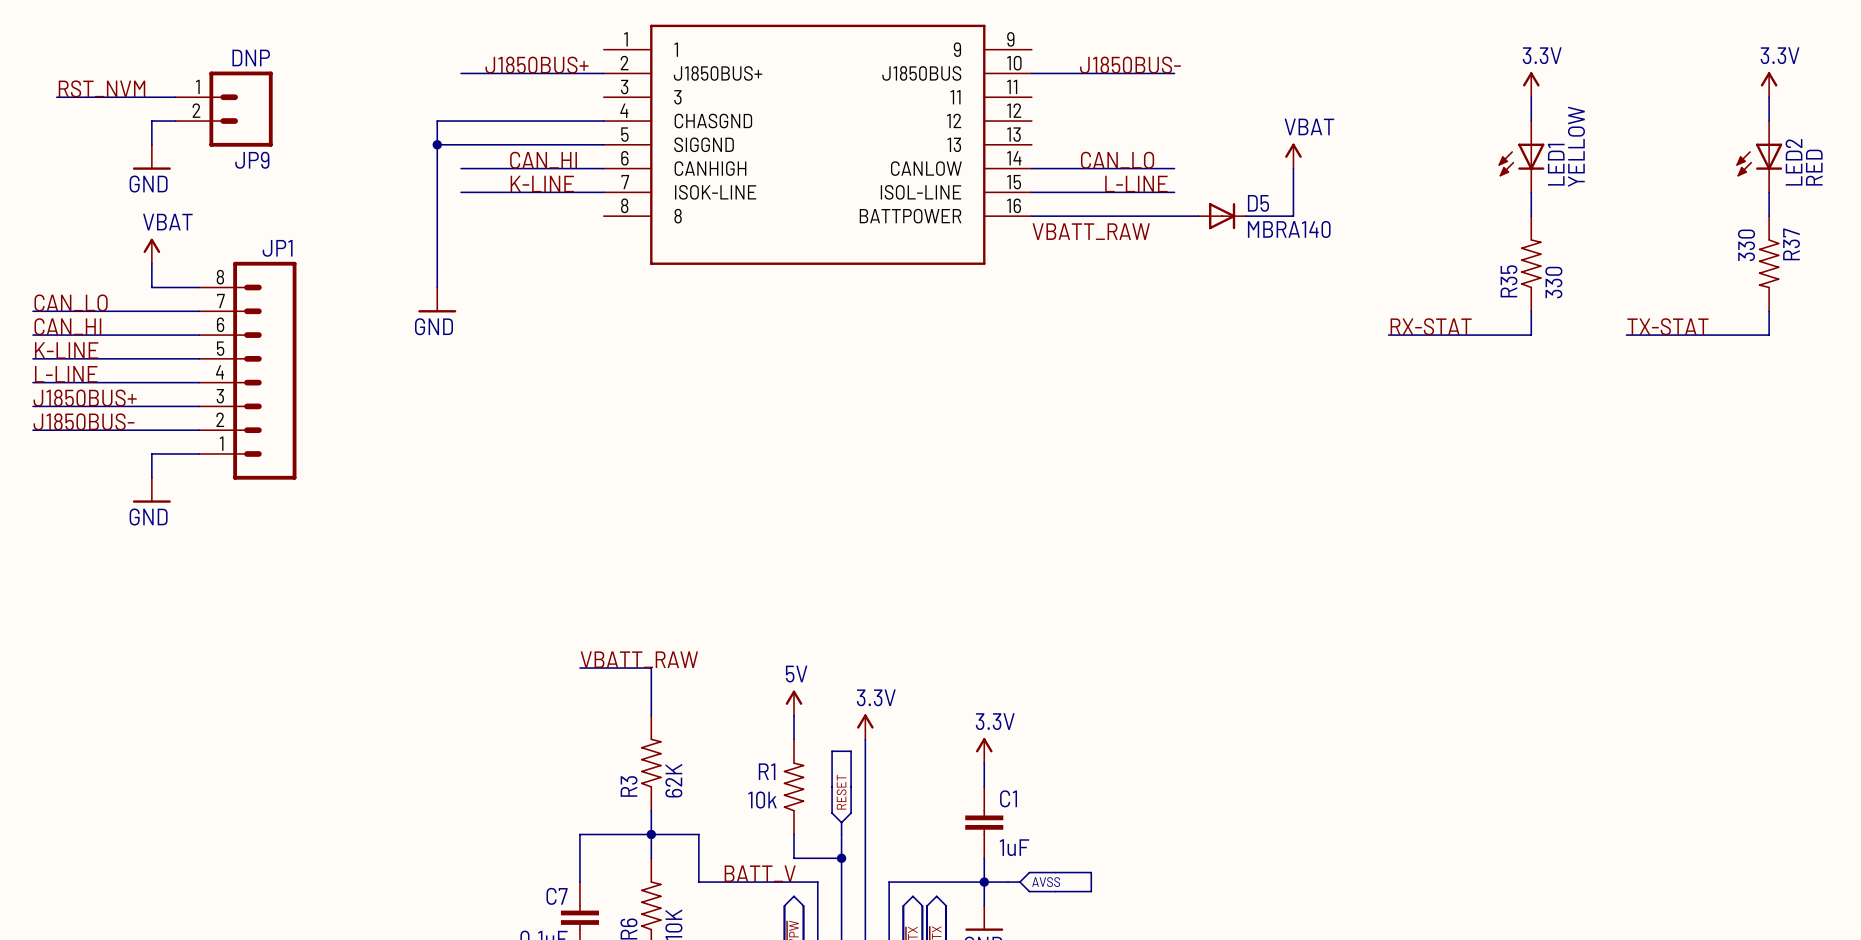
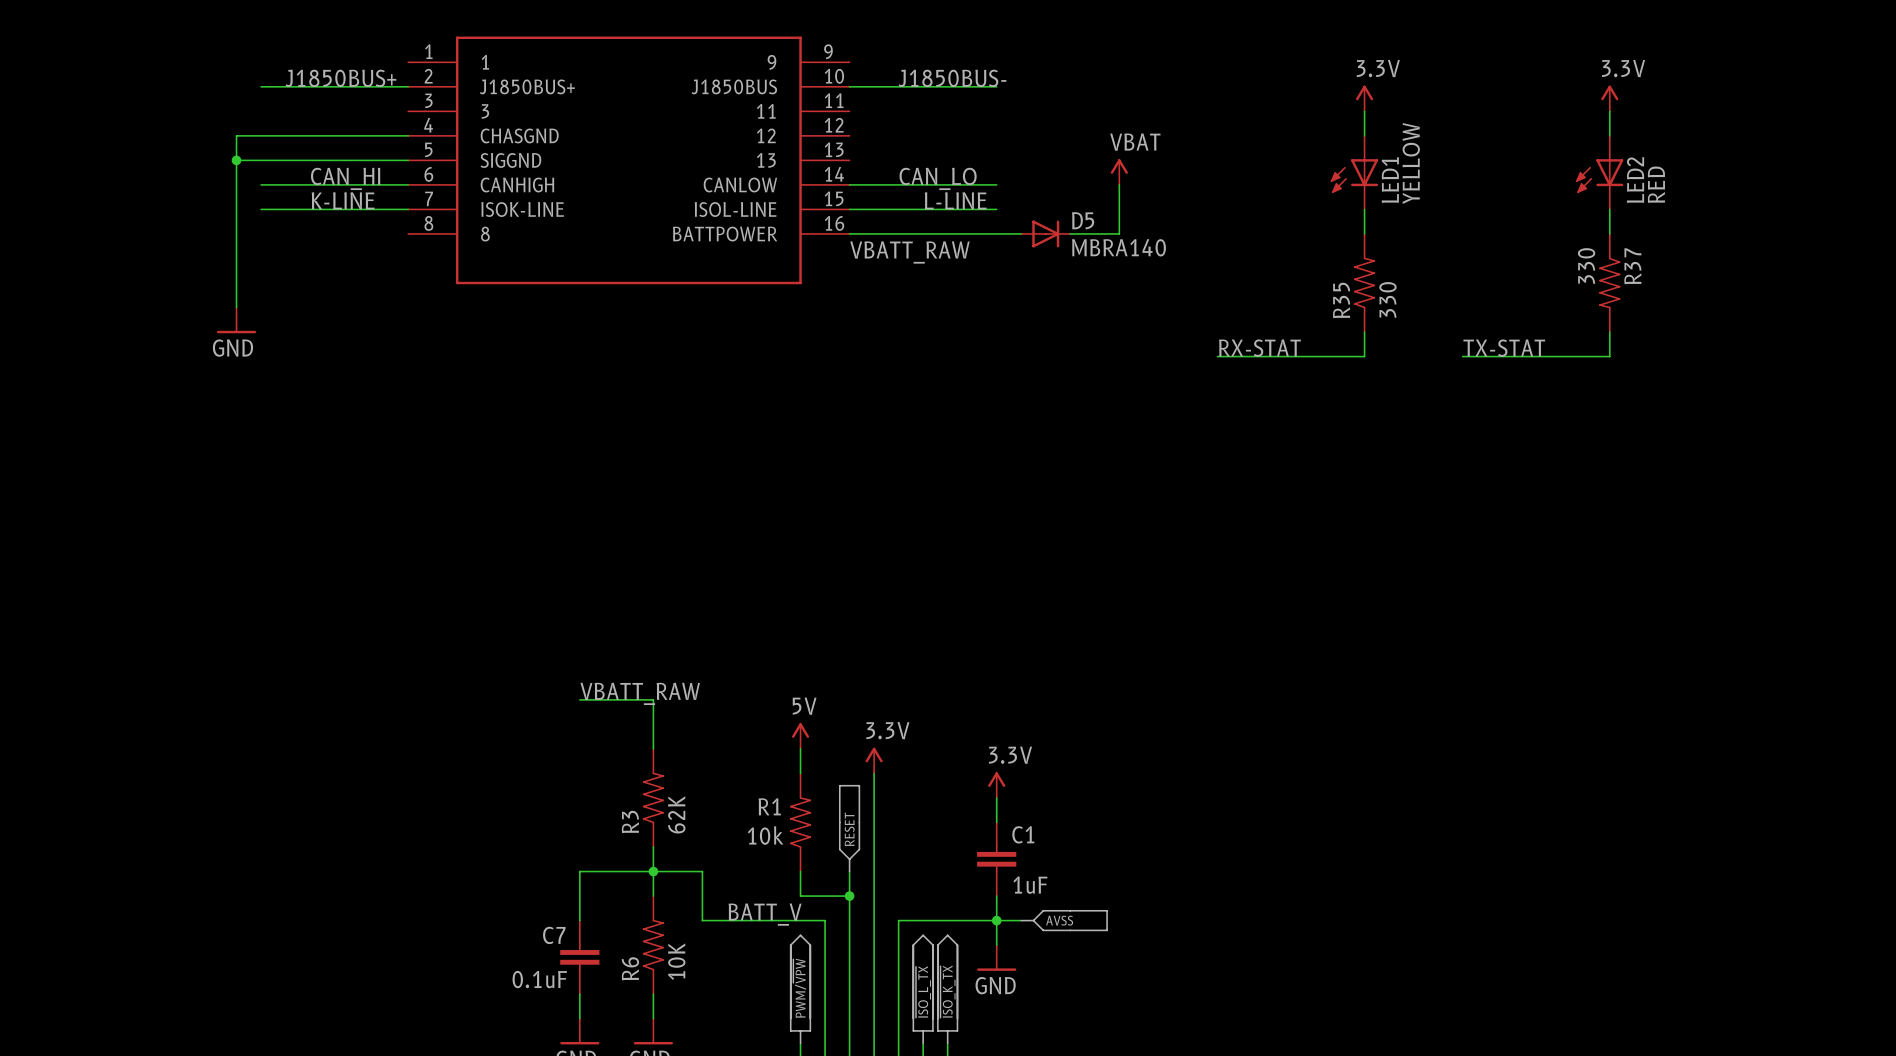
label position: J1850BUS+ (537, 65) -> J1850BUS+ (340, 78)
label position: J1850BUS- (1130, 65) -> J1850BUS- (952, 78)
wire: (461, 73) (603, 73) -> (261, 86) (408, 86)
wire: (1031, 73) (1174, 73) -> (849, 86) (996, 86)
power symbol: none -> 3.3V (1364, 98)
power symbol position: 3.3V (1531, 84) -> 3.3V (1609, 98)
power symbol: 3.3V (1769, 84) -> none
label: RST_NVM (102, 88) -> none
wire: (56, 97) (175, 97) -> none
wire: (1531, 97) (1531, 121) -> (1364, 111) (1364, 135)
wire: (1769, 97) (1769, 121) -> (1609, 111) (1609, 135)
JP9: DNP (224, 109) -> none
wire: (175, 121) (151, 121) (151, 144) -> none
wire: (603, 121) (437, 121) (437, 287) -> (408, 135) (236, 135) (236, 307)
junction: none -> (236, 160)
wire: (437, 144) (603, 144) -> (236, 160) (408, 160)
junction: (437, 144) -> none
part position: (817, 144) -> (628, 160)
power symbol position: VBAT (1293, 156) -> VBAT (1119, 172)
LED1 position: (1521, 156) -> (1354, 172)
LED2 position: (1759, 156) -> (1599, 172)
power symbol: GND (151, 157) -> none
label: none -> CAN_HI (345, 178)
label: CAN_HI (543, 160) -> none
label position: CAN_LO (1117, 160) -> CAN_LO (938, 178)
wire: (461, 168) (603, 168) -> (261, 184) (408, 184)
wire: (1031, 168) (1174, 168) -> (849, 184) (996, 184)
wire: (1293, 168) (1293, 216) (1245, 216) -> none
label: none -> K-LINE (343, 200)
label: K-LINE (542, 184) -> none
label position: L-LINE (1136, 184) -> L-LINE (955, 200)
wire: (461, 192) (603, 192) -> (261, 209) (408, 209)
wire: (1031, 192) (1174, 192) -> (849, 209) (996, 209)
wire: (1531, 192) (1531, 216) -> (1364, 209) (1364, 233)
wire: (1769, 192) (1769, 216) -> (1609, 209) (1609, 233)
wire: none -> (849, 233) (1021, 233)
wire: (1103, 216) (1198, 216) -> (1119, 233) (1119, 184)
D5 position: (1222, 216) -> (1045, 233)
label position: VBATT_RAW (1091, 231) -> VBATT_RAW (909, 252)
power symbol: VBAT (151, 251) -> none
wire: (151, 263) (151, 287) (199, 287) -> none
R35 position: (1531, 263) -> (1364, 283)
R37 position: (1769, 263) -> (1609, 283)
power symbol: none -> GND (236, 320)
power symbol: GND (437, 299) -> none
label: CAN_LO (71, 302) -> none
wire: (32, 311) (199, 311) -> none
wire: none -> (1364, 332) (1364, 356) (1217, 356)
wire: (1531, 311) (1531, 335) -> (1609, 332) (1609, 356) (1560, 356)
wire: (1769, 311) (1769, 335) (1626, 335) -> none
label: CAN_HI (67, 326) -> none
label position: RX-STAT (1431, 326) -> RX-STAT (1259, 348)
label position: TX-STAT (1667, 326) -> TX-STAT (1504, 348)
wire: (32, 335) (199, 335) -> none
wire: (1388, 335) (1436, 335) -> none
label: K-LINE (66, 350) -> none
wire: (32, 358) (199, 358) -> none
JP1: (247, 370) -> none
label: L-LINE (66, 374) -> none
wire: (32, 382) (199, 382) -> none
label: J1850BUS+ (85, 398) -> none
wire: (32, 406) (199, 406) -> none
label: J1850BUS- (84, 421) -> none
wire: (32, 430) (199, 430) -> none
wire: (199, 453) (151, 453) (151, 477) -> none
power symbol: GND (151, 490) -> none

